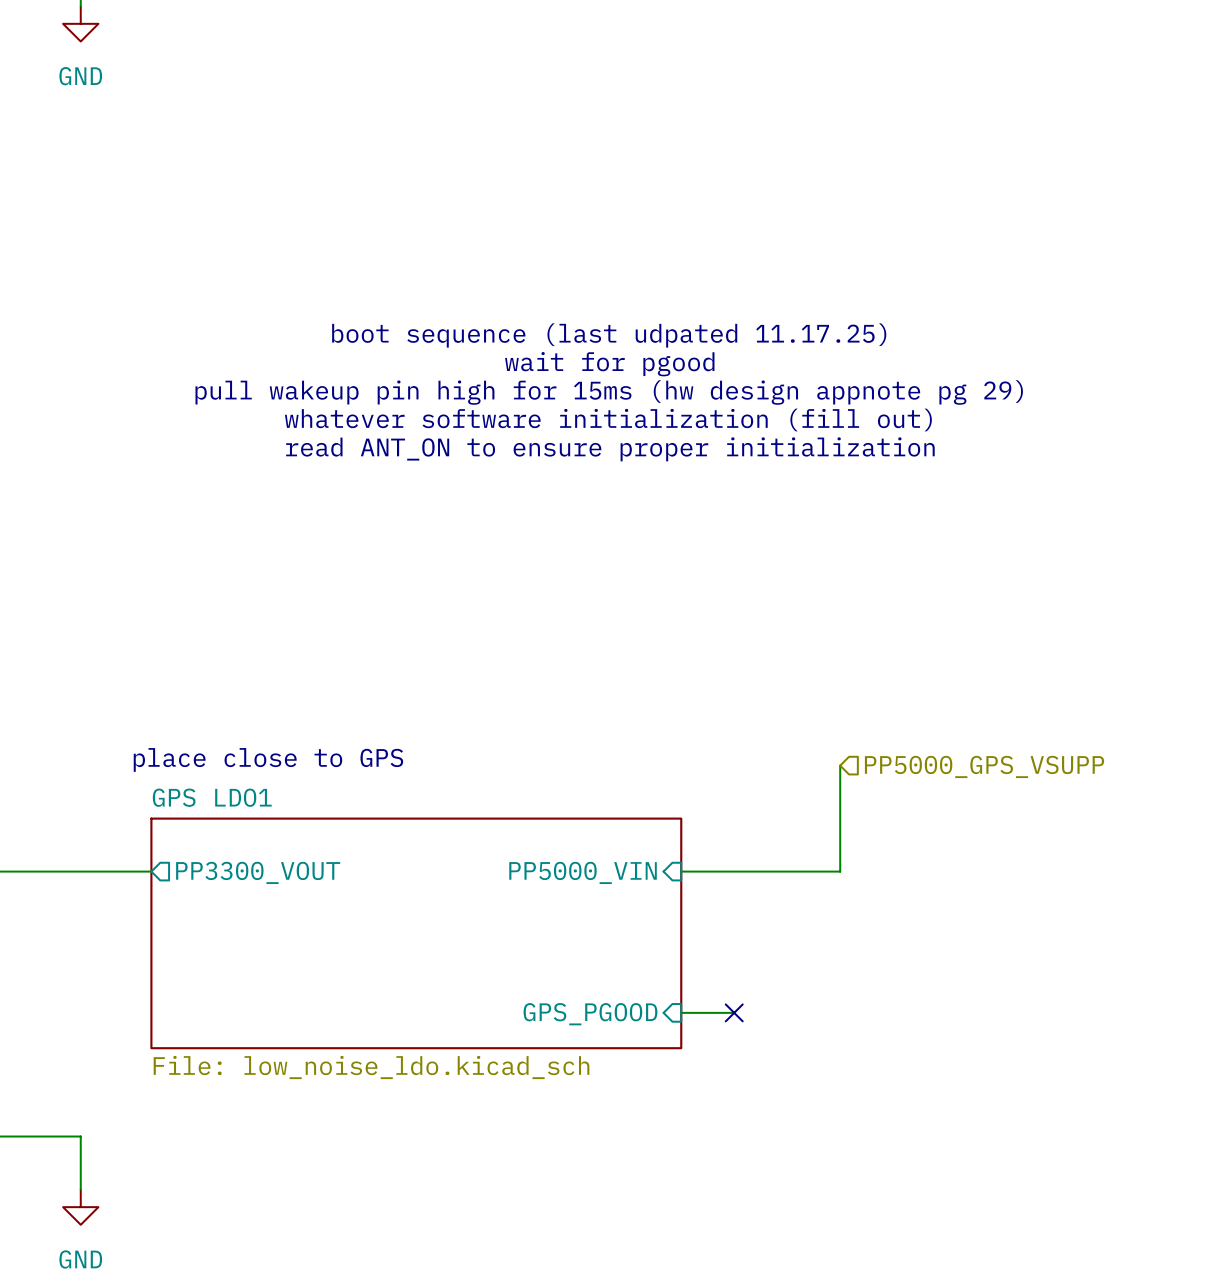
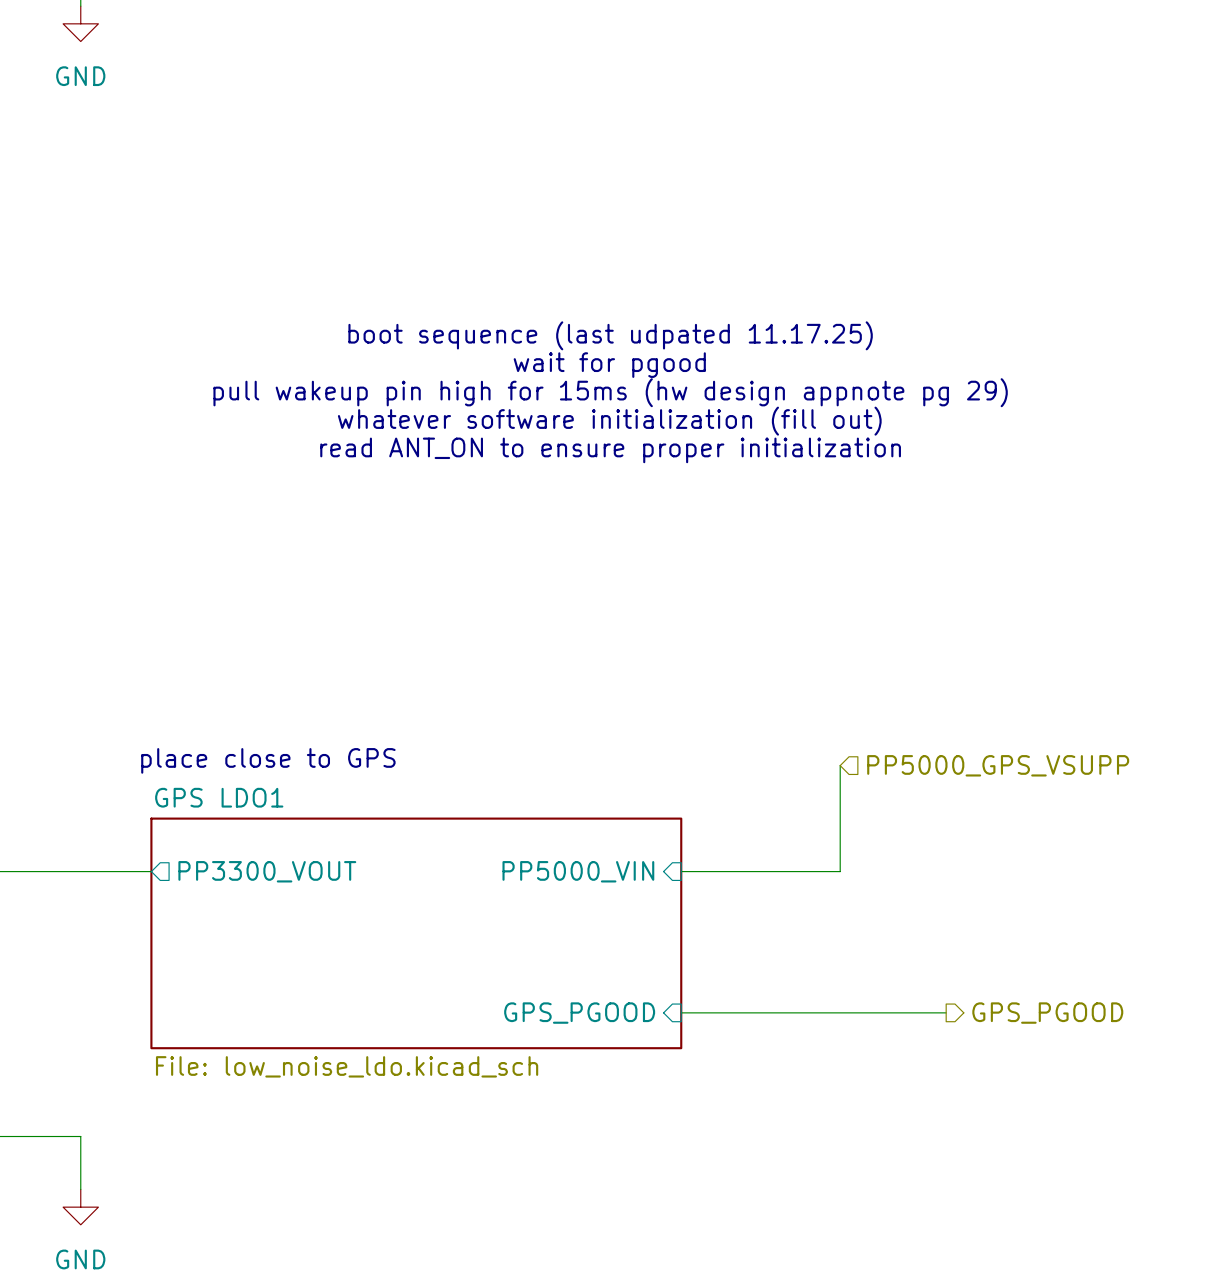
wire: none -> (734, 1012) (946, 1012)
no-connect mark: (734, 1012) -> none
hierarchical label: none -> GPS_PGOOD (1047, 1013)

